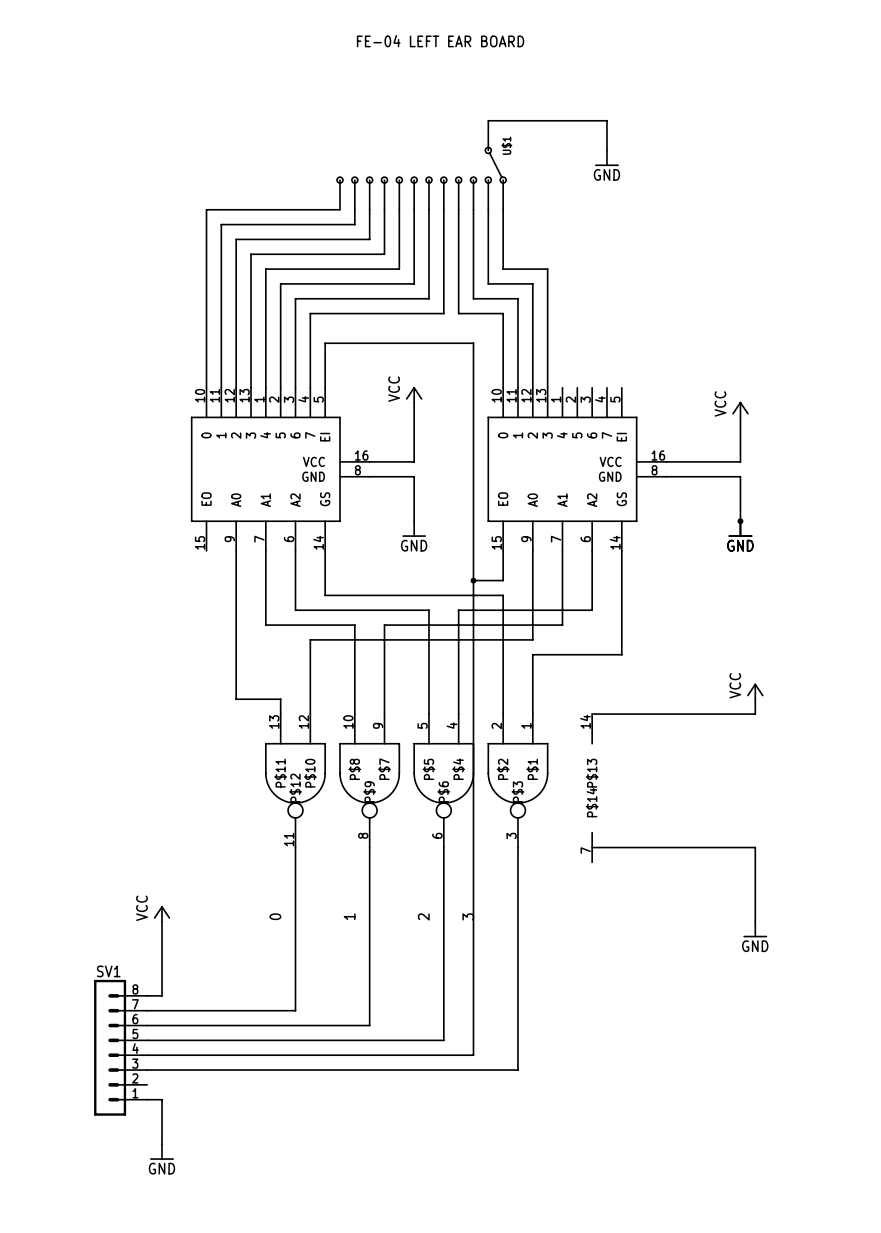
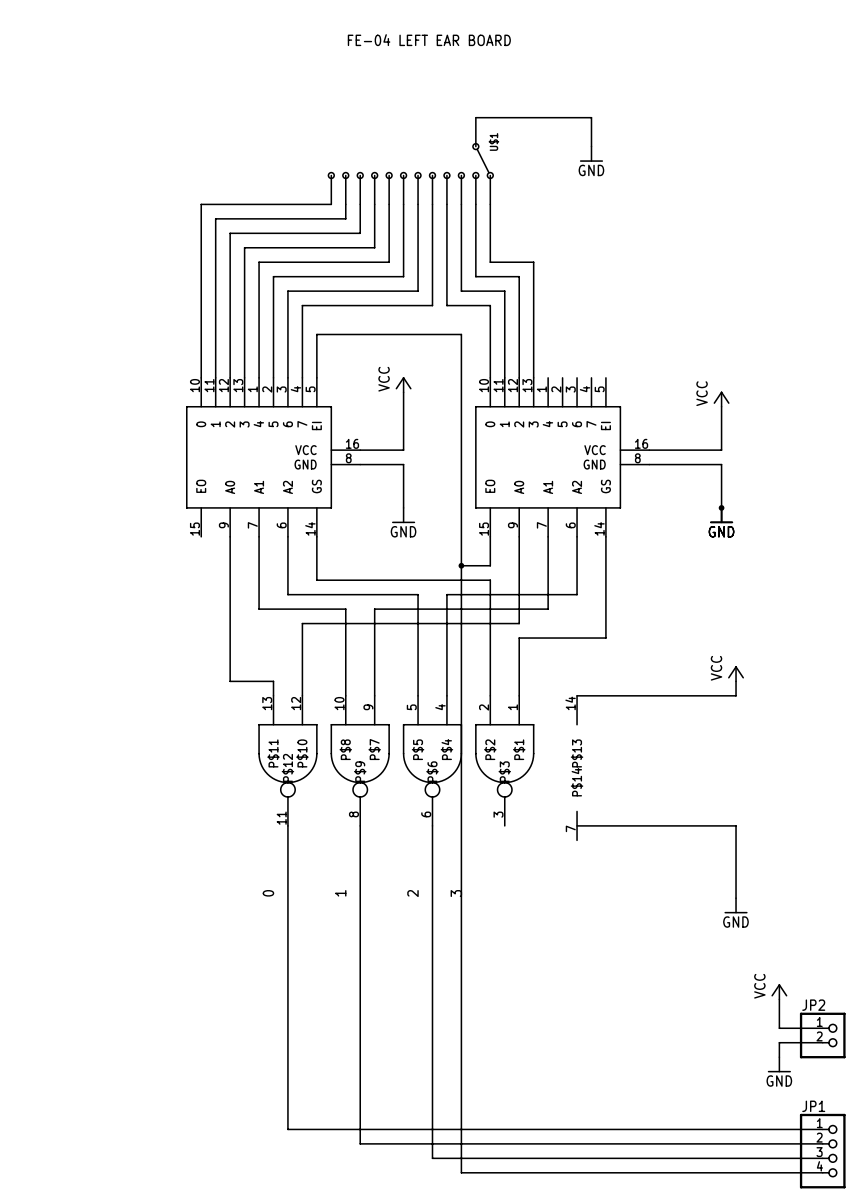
wire: (517, 847) (517, 1070) (147, 1070) -> none
power symbol: VCC (162, 913) -> none
wire: (162, 921) (162, 995) (147, 995) -> none
wire: (147, 1010) (295, 1010) -> (822, 1129) (287, 1129) (287, 984)
power symbol: none -> VCC (779, 991)
wire: (147, 1025) (369, 1025) -> (822, 1143) (360, 1143) (360, 999)
wire: none -> (779, 999) (779, 1028) (822, 1028)
wire: (147, 1040) (443, 1040) -> (822, 1158) (432, 1158) (432, 1013)
SV1: (120, 1047) -> none
wire: (147, 1055) (473, 1055) -> (822, 1172) (461, 1172) (461, 1028)
JP2: none -> (822, 1035)
wire: none -> (822, 1042) (779, 1042) (779, 1057)
power symbol: none -> GND (779, 1064)
wire: (147, 1099) (162, 1099) (162, 1144) -> none
power symbol: GND (162, 1151) -> none
JP1: none -> (822, 1151)

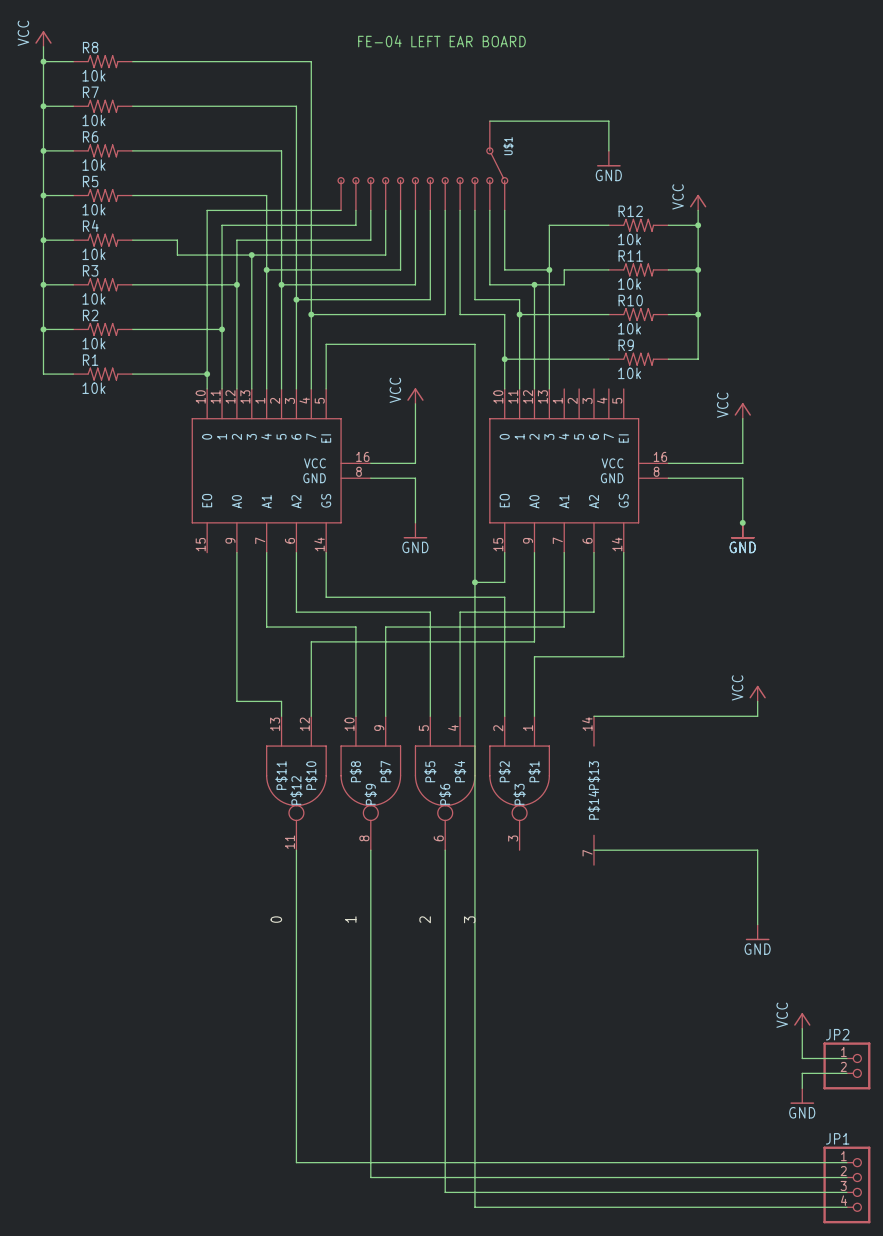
power symbol: none -> VCC (43, 38)
wire: none -> (43, 46) (43, 374) (73, 374)
wire: none -> (43, 61) (73, 61)
junction: none -> (43, 61)
R8: none -> 10k (103, 61)
wire: none -> (132, 61) (311, 61) (311, 314)
wire: none -> (43, 106) (73, 106)
junction: none -> (43, 106)
R7: none -> 10k (103, 106)
wire: none -> (132, 106) (296, 106) (296, 299)
wire: none -> (43, 150) (73, 150)
junction: none -> (43, 150)
R6: none -> 10k (103, 150)
wire: none -> (132, 150) (281, 150) (281, 284)
wire: none -> (43, 195) (73, 195)
junction: none -> (43, 195)
R5: none -> 10k (103, 195)
wire: none -> (132, 195) (266, 195) (266, 269)
power symbol: none -> VCC (698, 202)
wire: none -> (698, 210) (698, 359) (668, 359)
wire: none -> (608, 225) (549, 225) (549, 269)
R12: none -> 10k (638, 225)
wire: none -> (668, 225) (698, 225)
junction: none -> (698, 225)
wire: none -> (43, 240) (73, 240)
junction: none -> (43, 240)
R4: none -> 10k (103, 240)
wire: none -> (132, 240) (177, 240) (177, 255) (251, 255)
junction: none -> (251, 255)
junction: none -> (266, 269)
junction: none -> (549, 269)
wire: none -> (608, 269) (564, 269) (564, 284) (534, 284)
R11: none -> 10k (638, 269)
wire: none -> (668, 269) (698, 269)
junction: none -> (698, 269)
wire: none -> (43, 284) (73, 284)
junction: none -> (43, 284)
R3: none -> 10k (103, 284)
wire: none -> (132, 284) (236, 284)
junction: none -> (236, 284)
junction: none -> (281, 284)
junction: none -> (534, 284)
junction: none -> (296, 299)
junction: none -> (311, 314)
wire: none -> (519, 314) (608, 314)
junction: none -> (519, 314)
R10: none -> 10k (638, 314)
wire: none -> (668, 314) (698, 314)
junction: none -> (698, 314)
wire: none -> (43, 329) (73, 329)
junction: none -> (43, 329)
R2: none -> 10k (103, 329)
wire: none -> (132, 329) (222, 329)
junction: none -> (222, 329)
wire: none -> (504, 359) (608, 359)
junction: none -> (504, 359)
R9: none -> 10k (638, 359)
R1: none -> 10k (103, 374)
wire: none -> (132, 374) (207, 374)
junction: none -> (207, 374)

